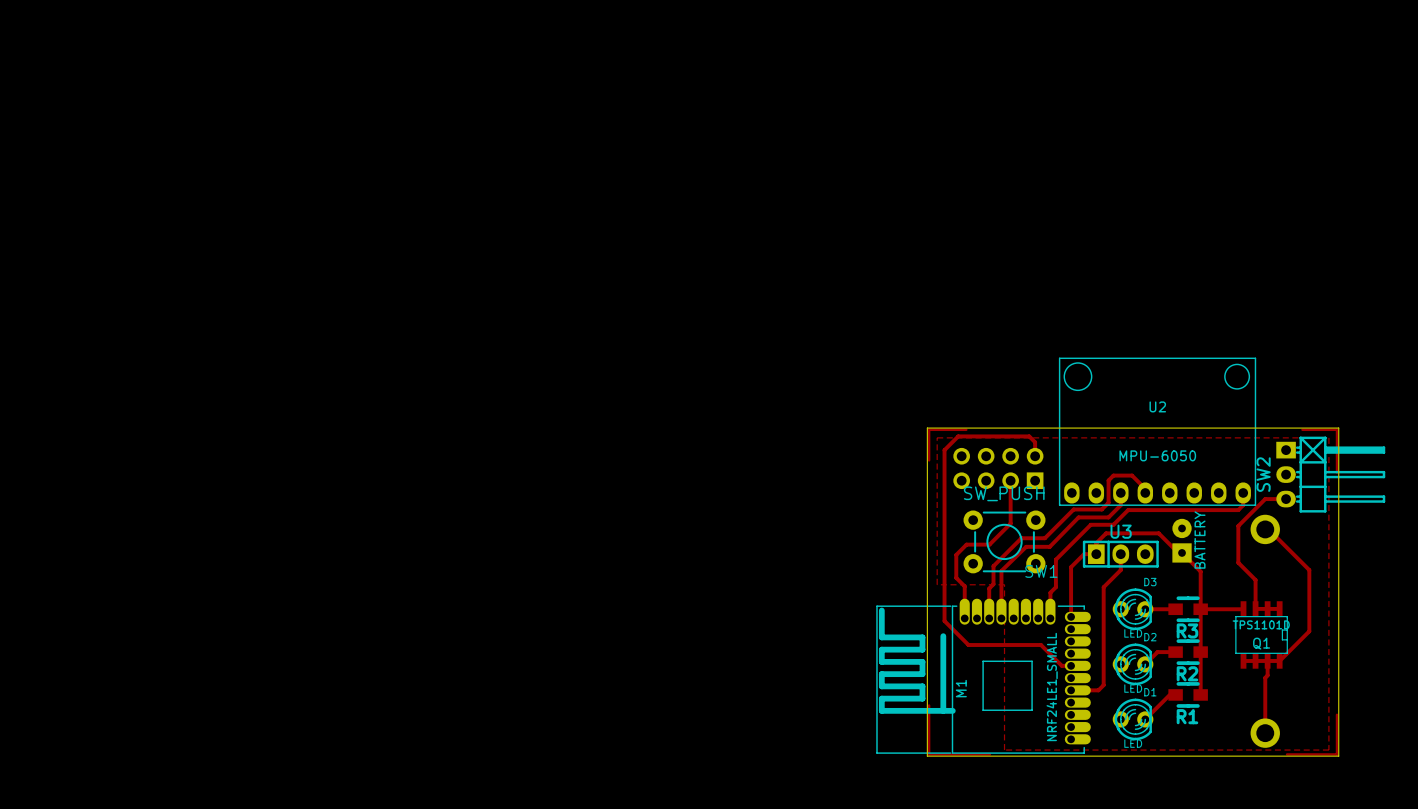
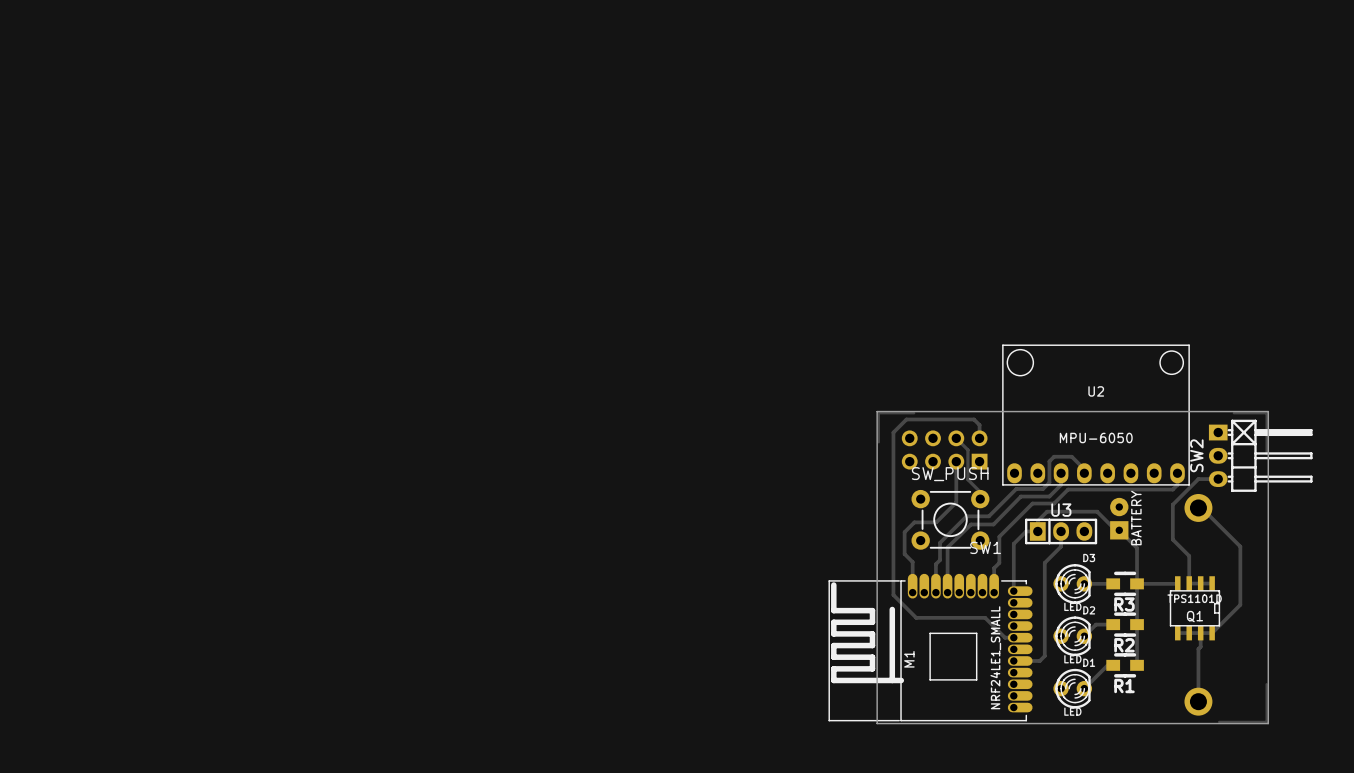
zone outline: (937, 437) (1328, 437) (1328, 750) (1004, 750) (1004, 584) (937, 584) (937, 437) -> none
track: none -> (956, 438) (967, 449) (967, 479) (980, 492) (980, 499)
track: (929, 705) (929, 754) (989, 754) -> none

